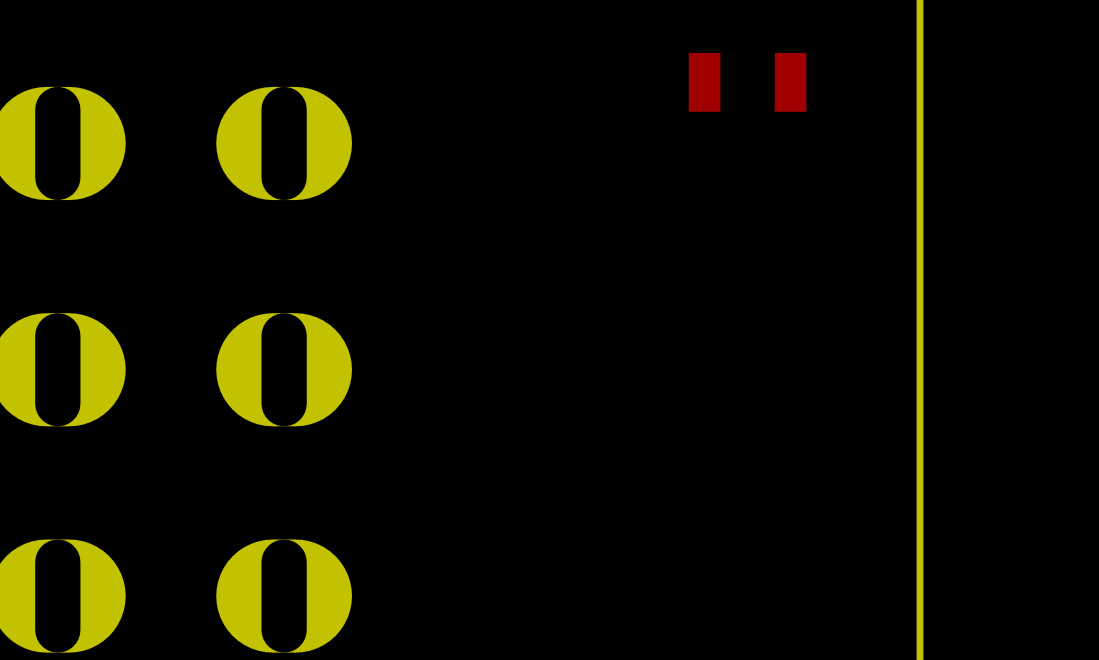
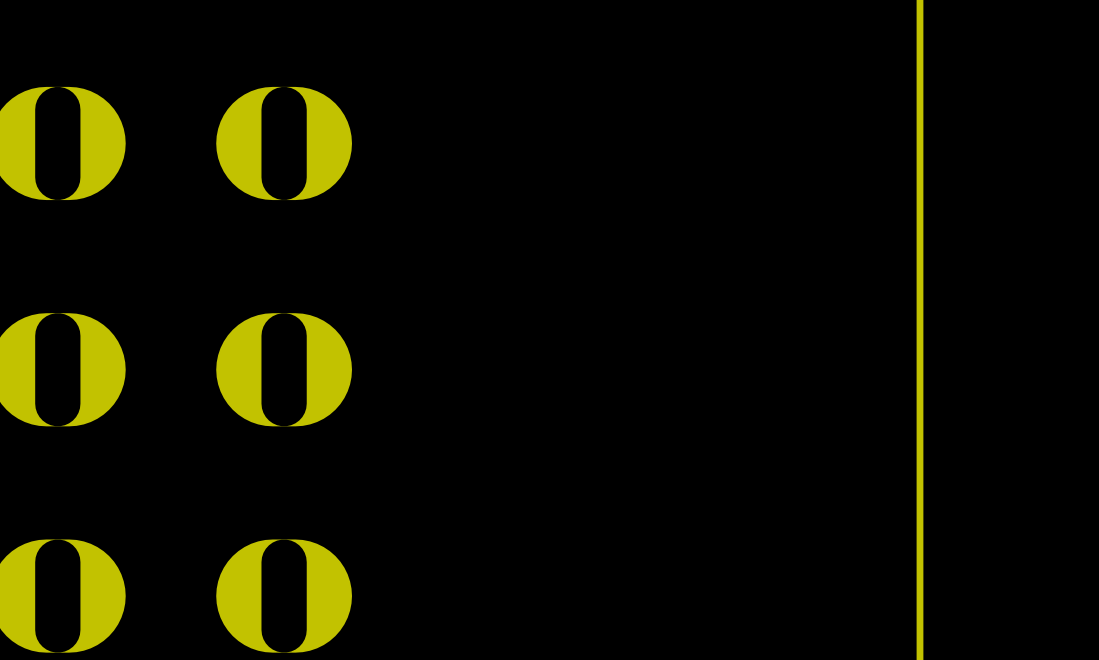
part: (747, 82) -> none

